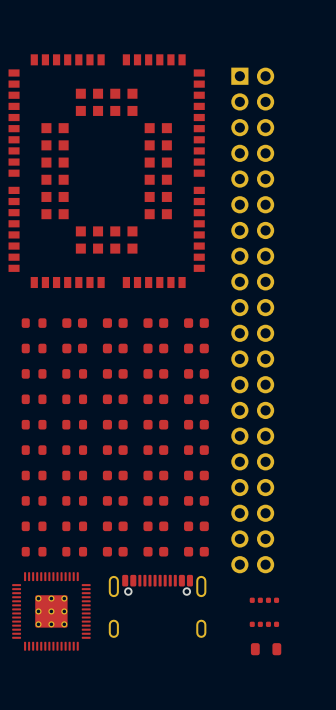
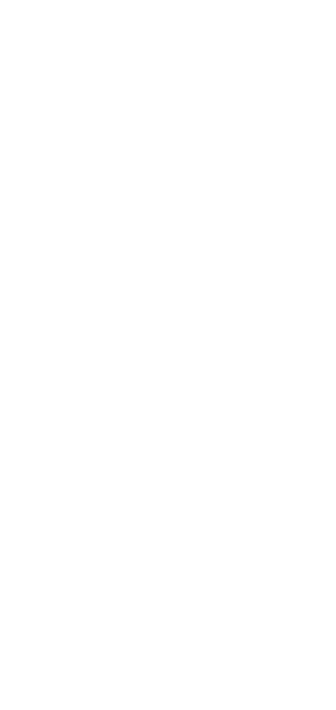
part: (106, 171) -> none
part: (252, 320) -> none
part: (34, 323) -> none
part: (74, 323) -> none
part: (115, 323) -> none
part: (155, 323) -> none
part: (196, 323) -> none
part: (34, 348) -> none
part: (74, 348) -> none
part: (115, 348) -> none
part: (155, 348) -> none
part: (196, 348) -> none
part: (34, 373) -> none
part: (74, 373) -> none
part: (115, 373) -> none
part: (155, 373) -> none
part: (196, 373) -> none
part: (34, 399) -> none
part: (74, 399) -> none
part: (115, 399) -> none
part: (155, 399) -> none
part: (196, 399) -> none
part: (34, 424) -> none
part: (74, 424) -> none
part: (115, 424) -> none
part: (155, 424) -> none
part: (196, 424) -> none
part: (34, 450) -> none
part: (74, 450) -> none
part: (115, 450) -> none
part: (155, 450) -> none
part: (196, 450) -> none
part: (34, 475) -> none
part: (74, 475) -> none
part: (115, 475) -> none
part: (155, 475) -> none
part: (196, 475) -> none
part: (34, 500) -> none
part: (74, 500) -> none
part: (115, 500) -> none
part: (155, 500) -> none
part: (196, 500) -> none
part: (34, 526) -> none
part: (74, 526) -> none
part: (115, 526) -> none
part: (155, 526) -> none
part: (196, 526) -> none
part: (34, 551) -> none
part: (74, 551) -> none
part: (115, 551) -> none
part: (155, 551) -> none
part: (196, 551) -> none
part: (157, 606) -> none
part: (51, 611) -> none
part: (264, 612) -> none
part: (266, 649) -> none

